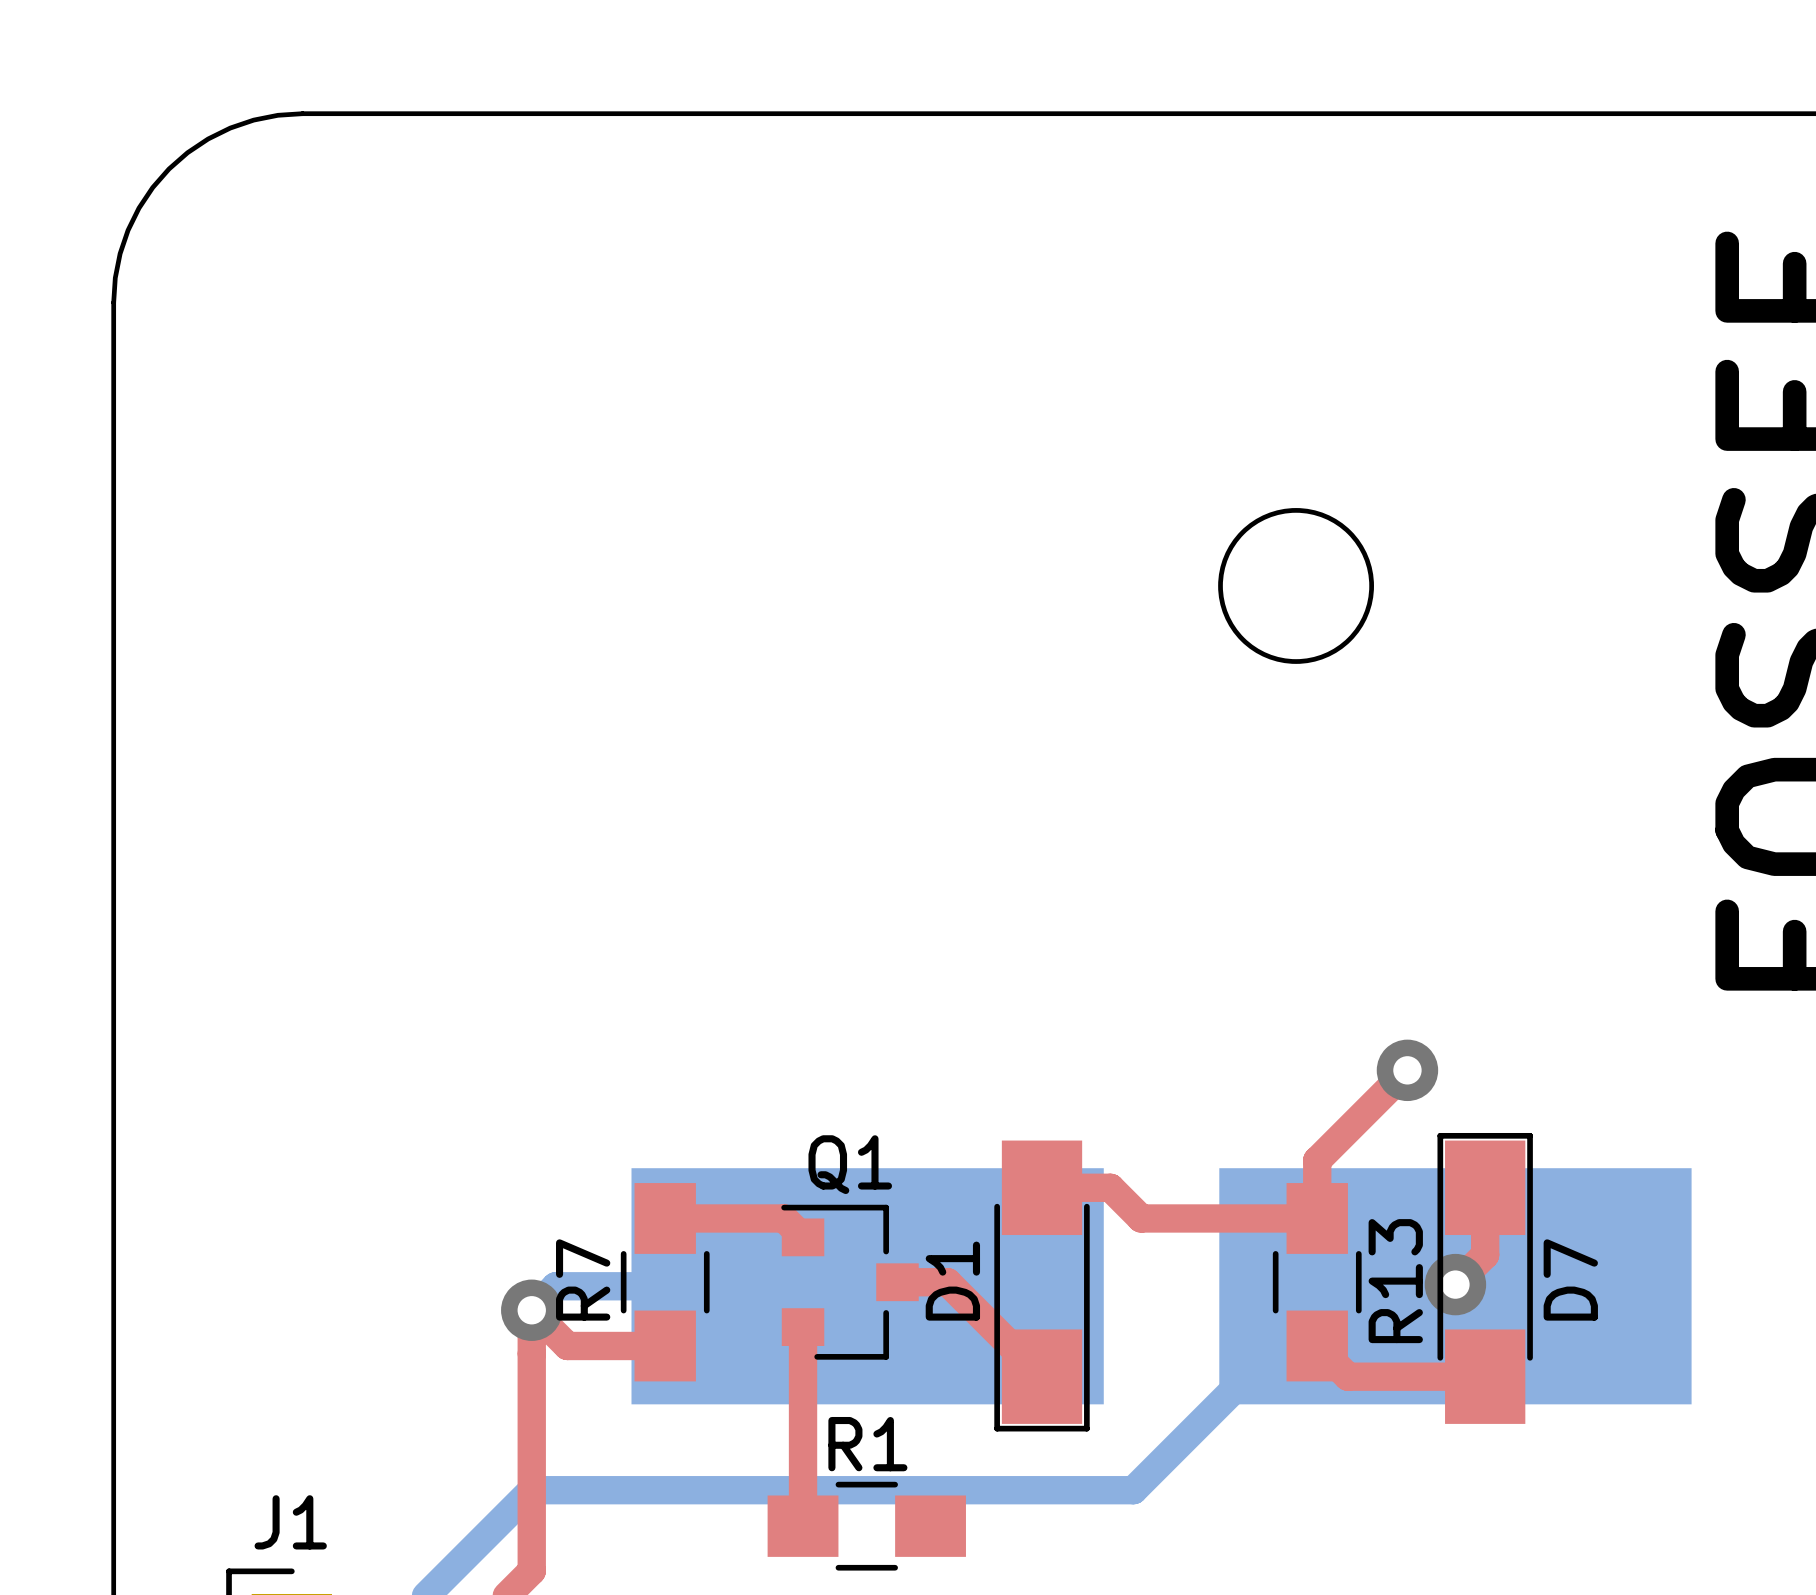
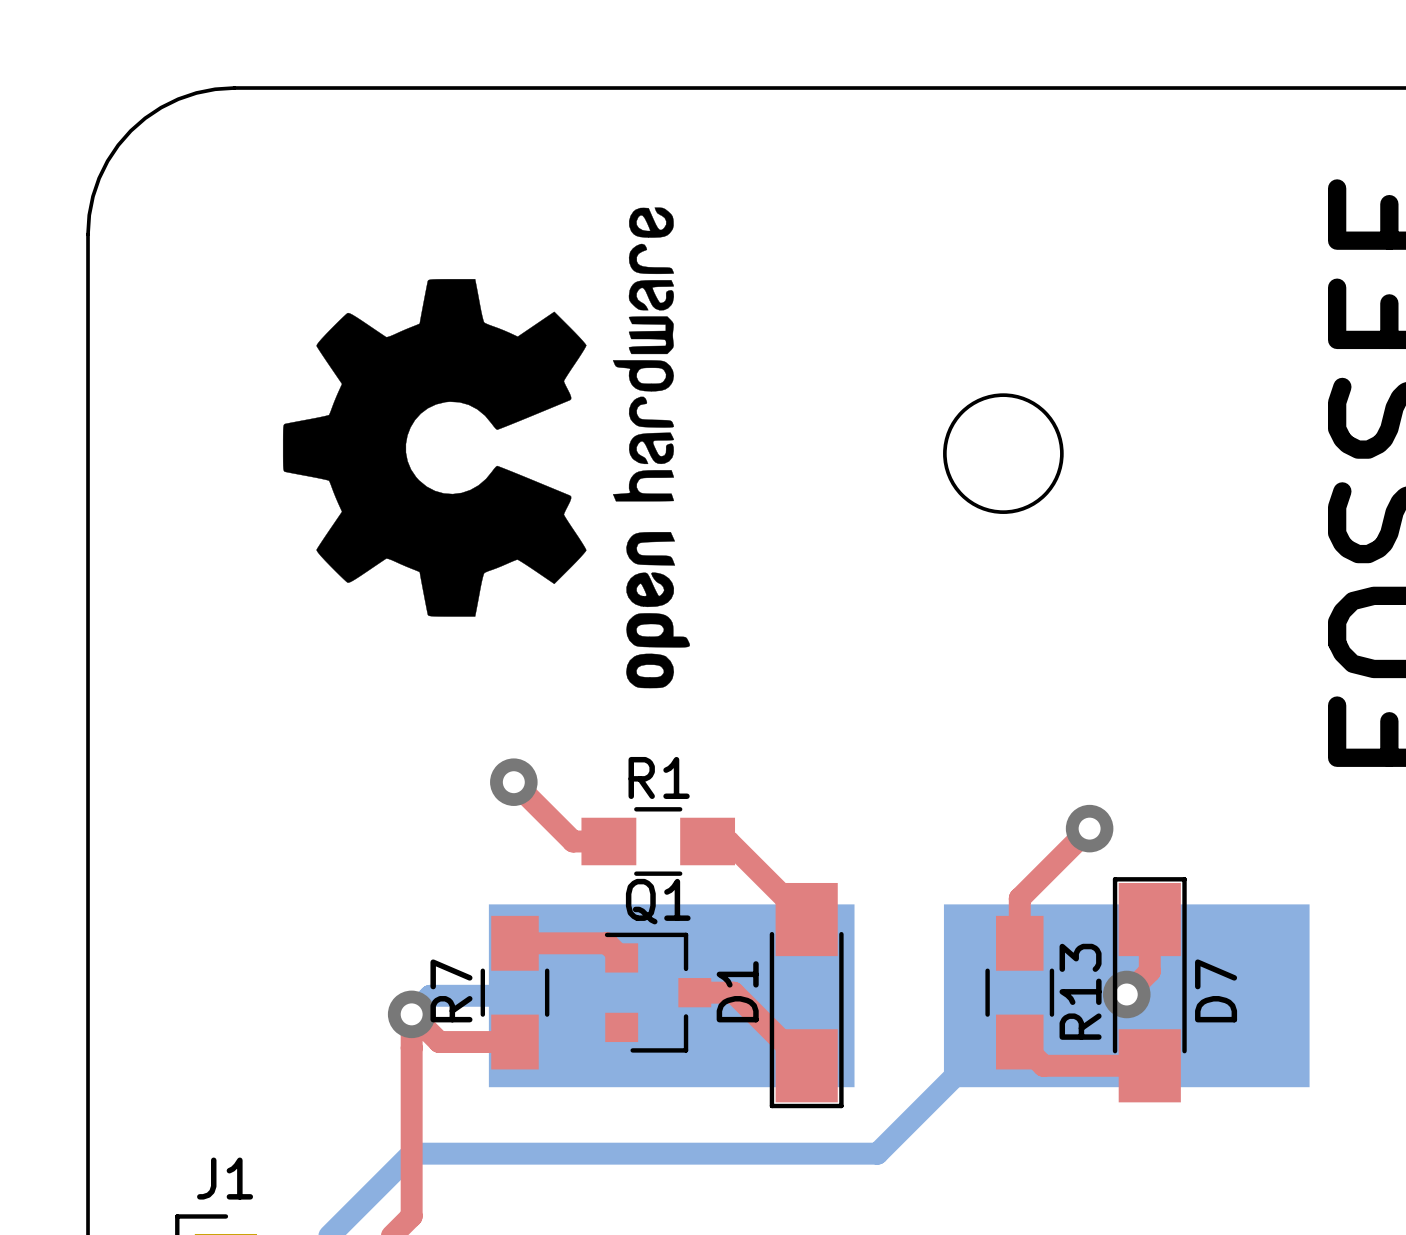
drawing: none -> [282, 207, 690, 689]
top track: none -> (513, 782) (573, 841) (608, 841)
via: none -> (513, 782)
top track: (1042, 1187) (1110, 1187) (1141, 1218) (1317, 1218) -> (806, 919) (728, 841) (707, 841)
top track: (803, 1327) (803, 1526) -> none
R1 position: (866, 1526) -> (658, 841)

